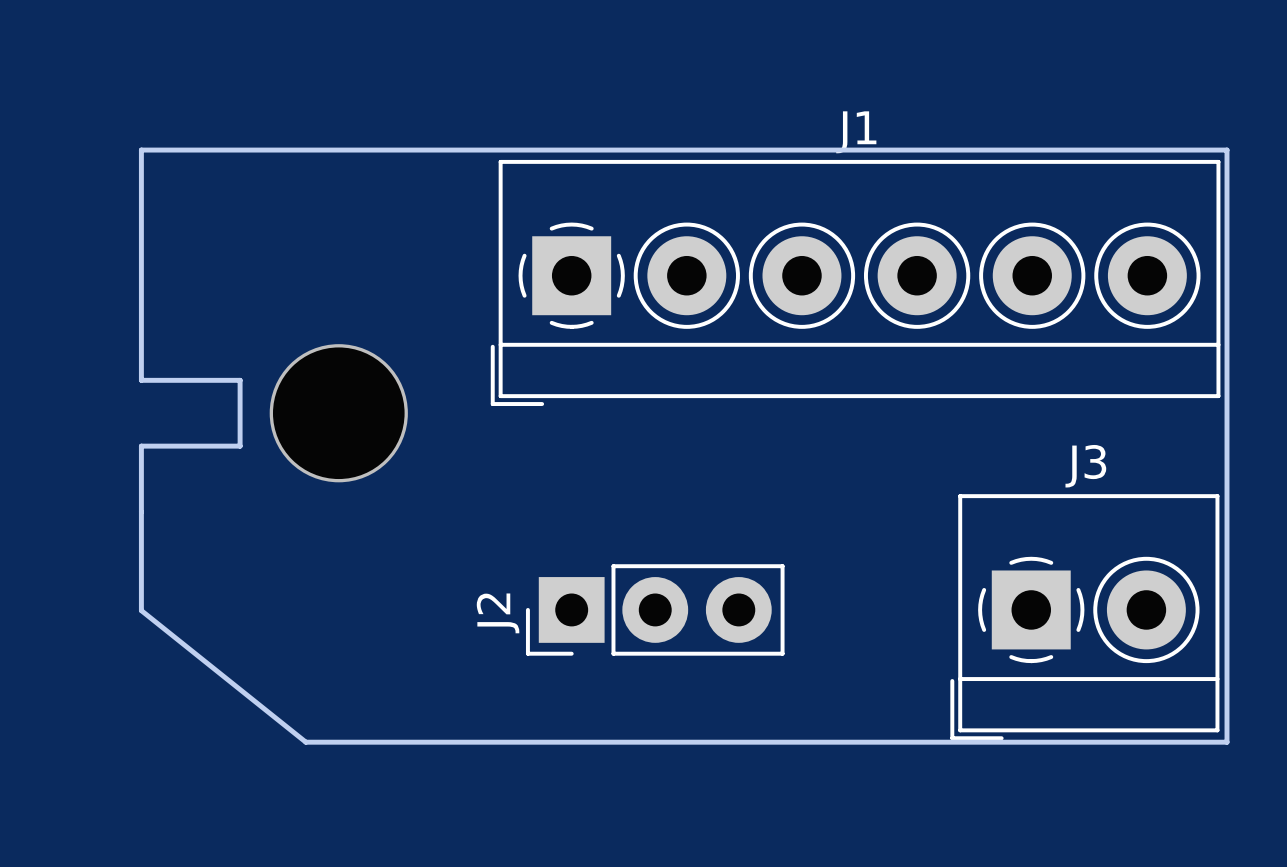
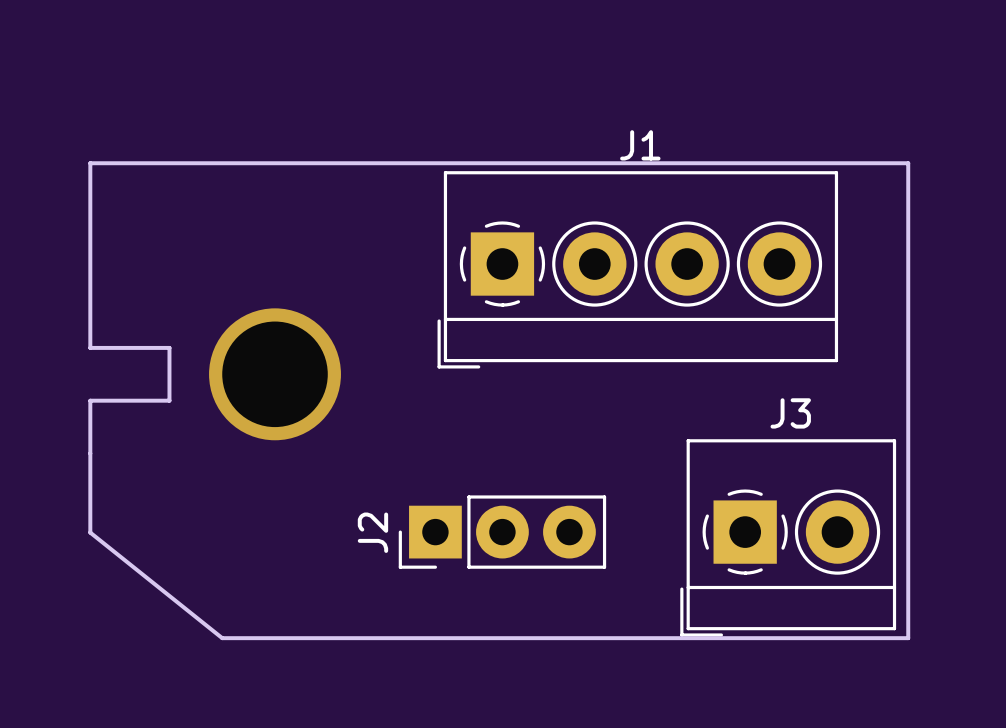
board edge: (1161, 150) (1227, 150) (1227, 742) (1161, 742) -> (908, 163) (908, 638)
J1 footprint: [490, 159, 1221, 406] -> [437, 171, 839, 369]
via size: [269, 344, 408, 483] -> [209, 308, 341, 441]
J3 position: (1084, 617) -> (788, 537)

